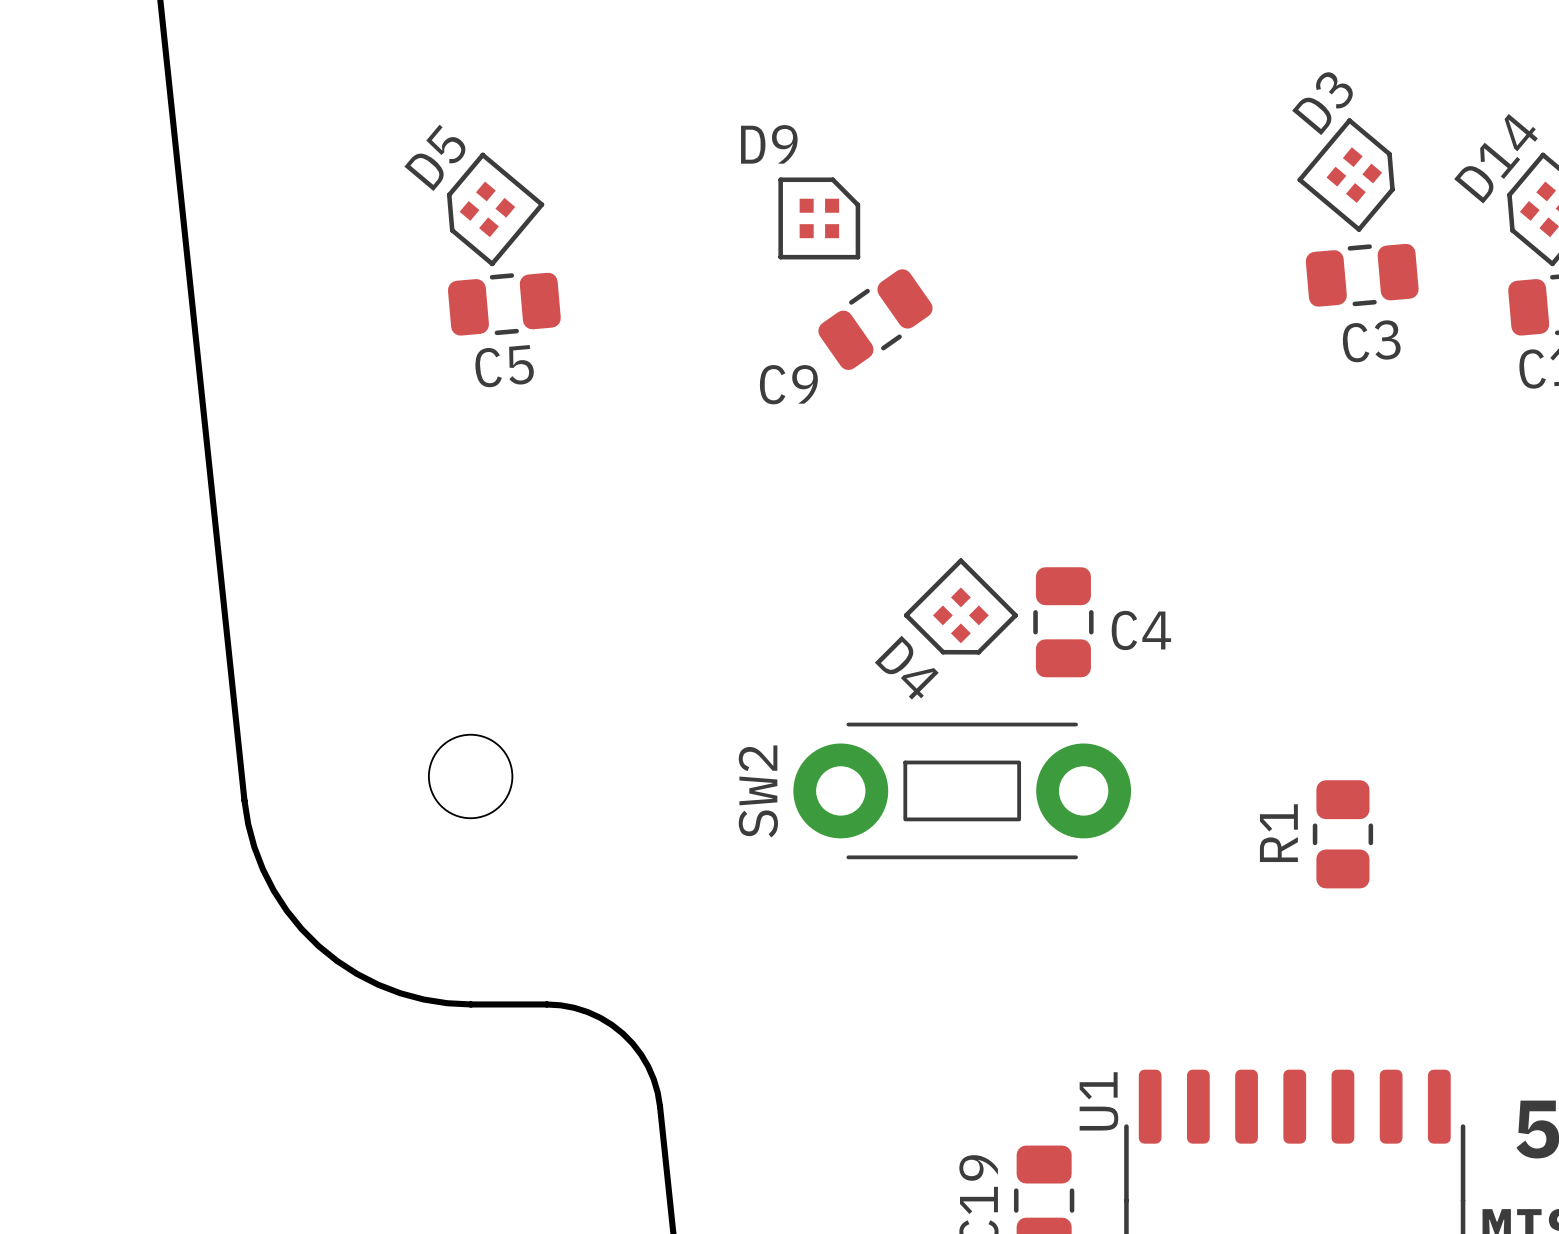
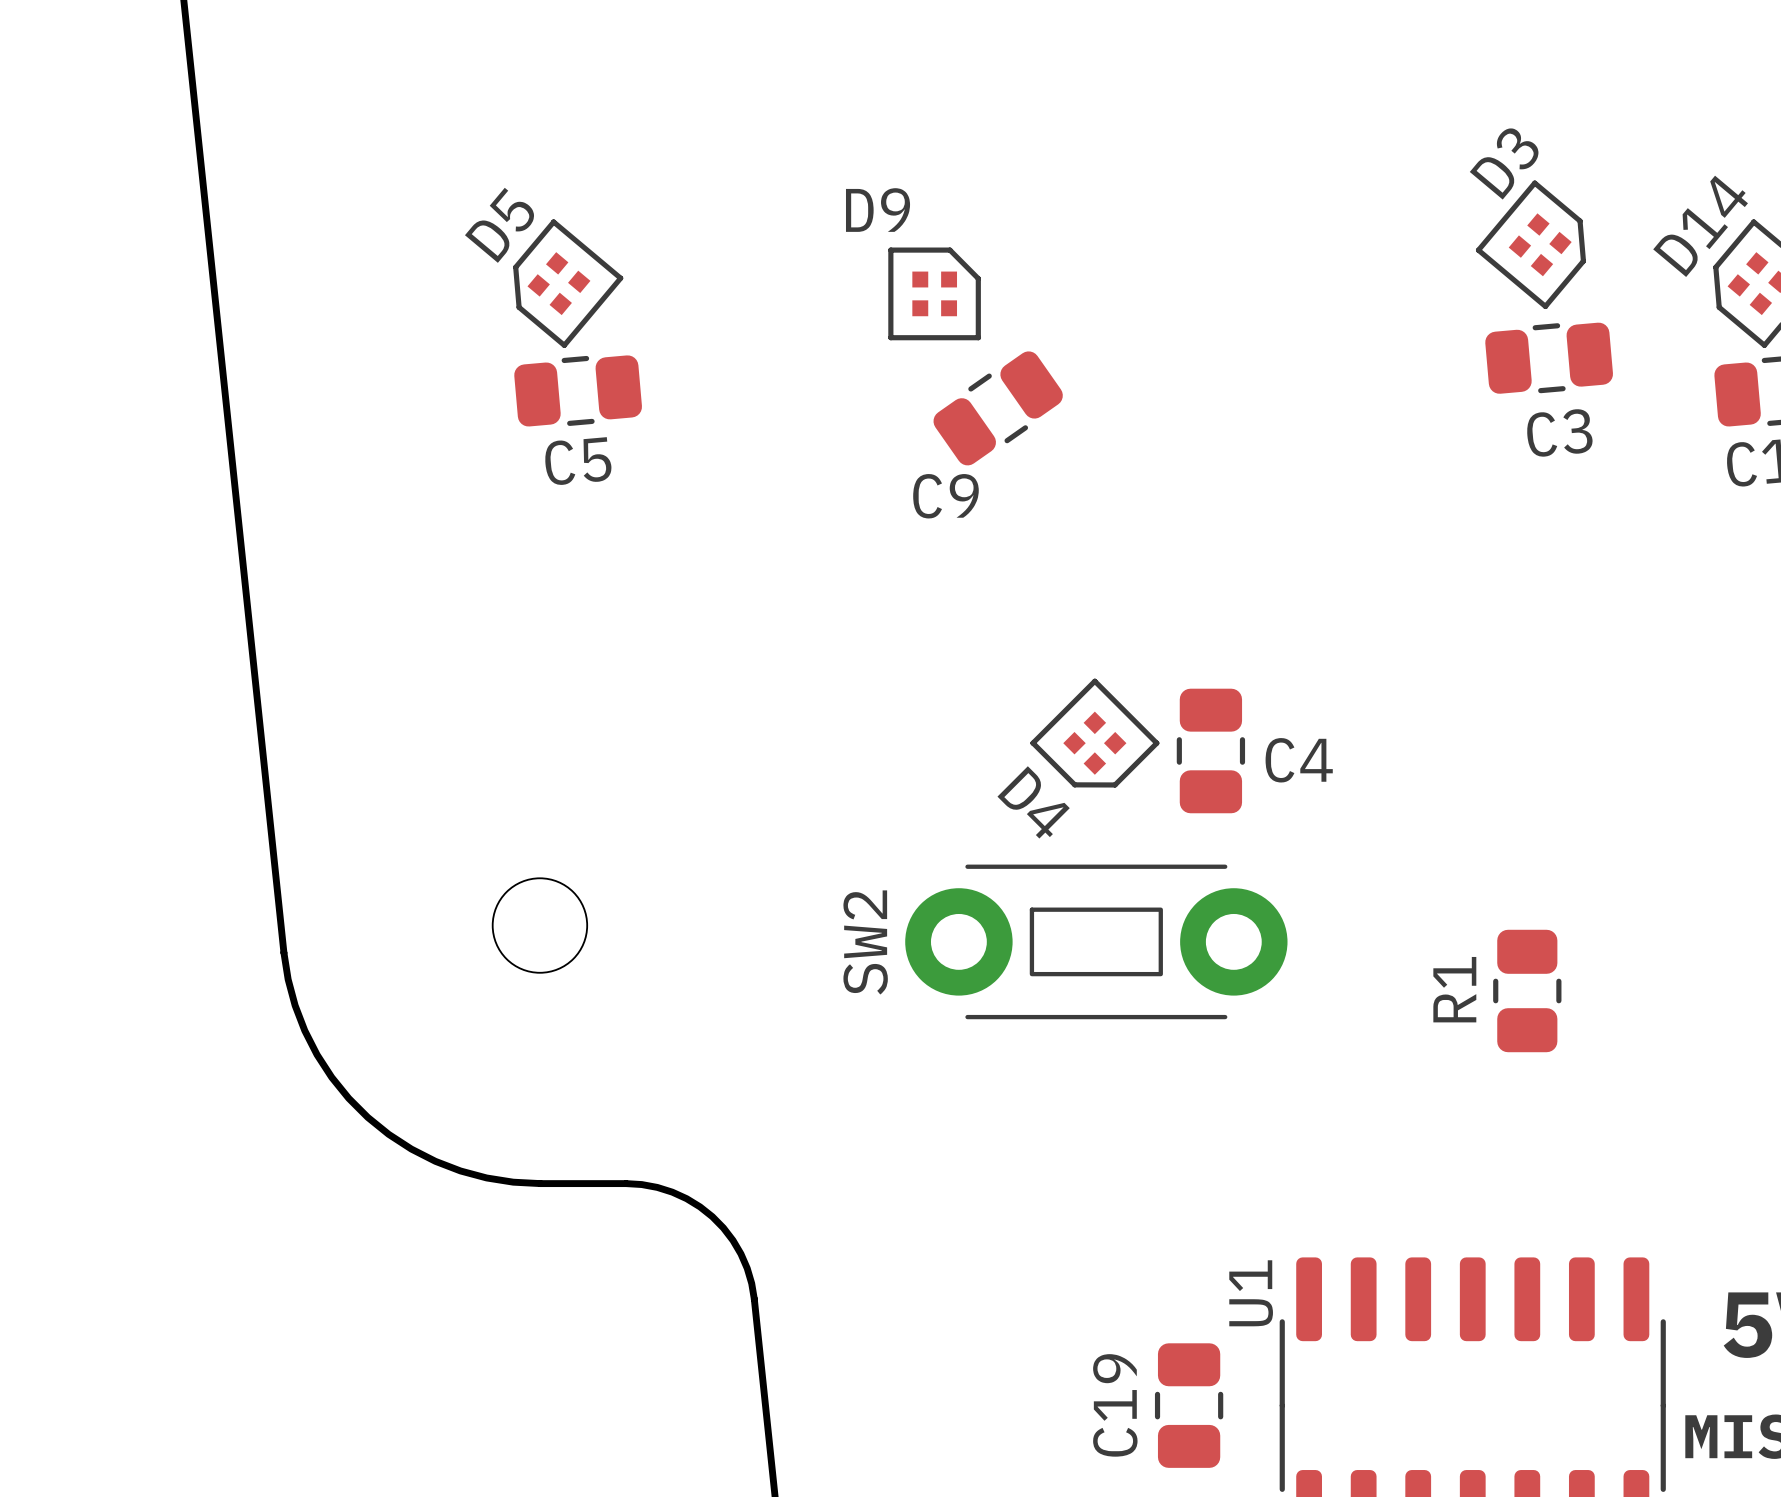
C9 name position: C9 (788, 384) -> C9 (945, 496)

